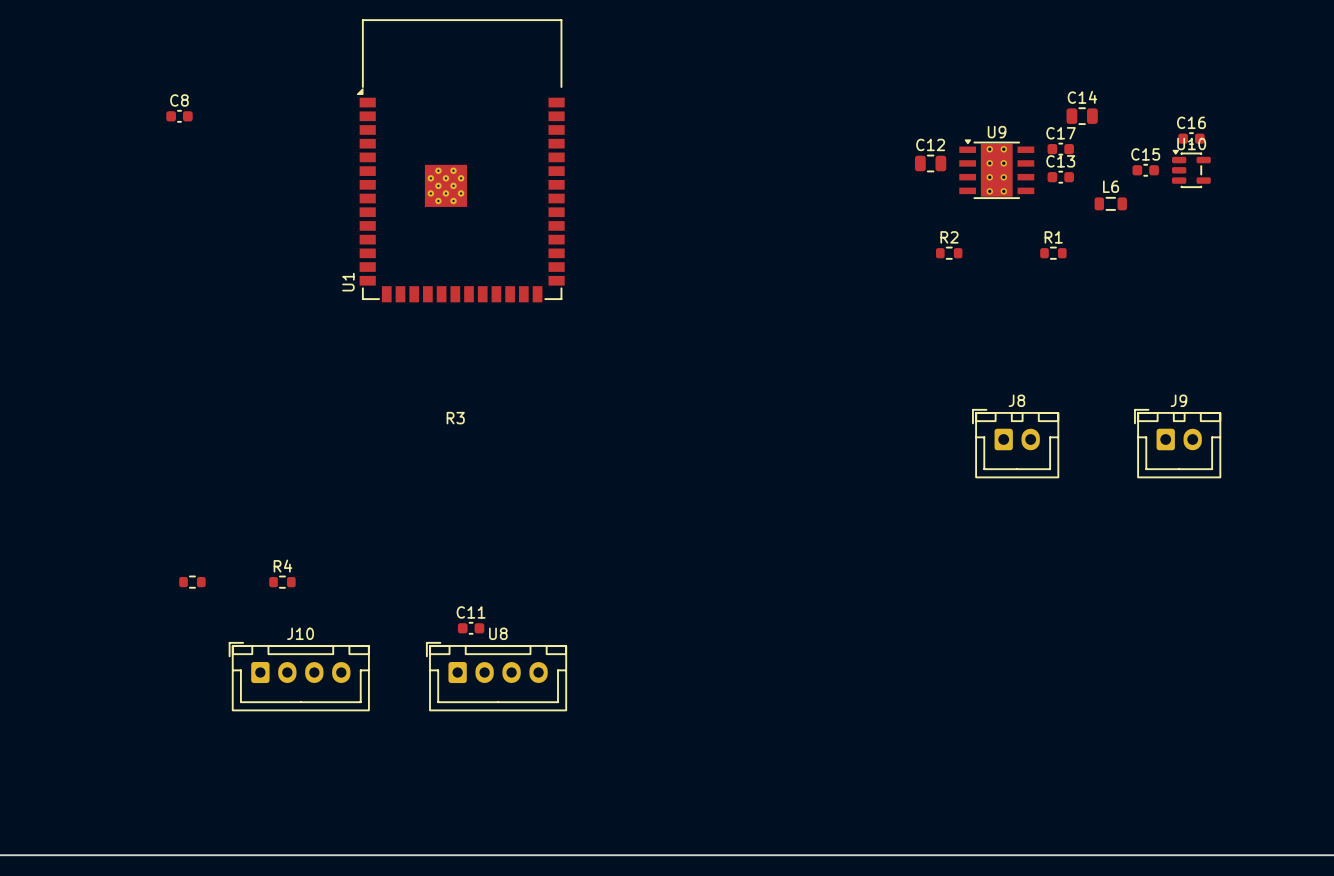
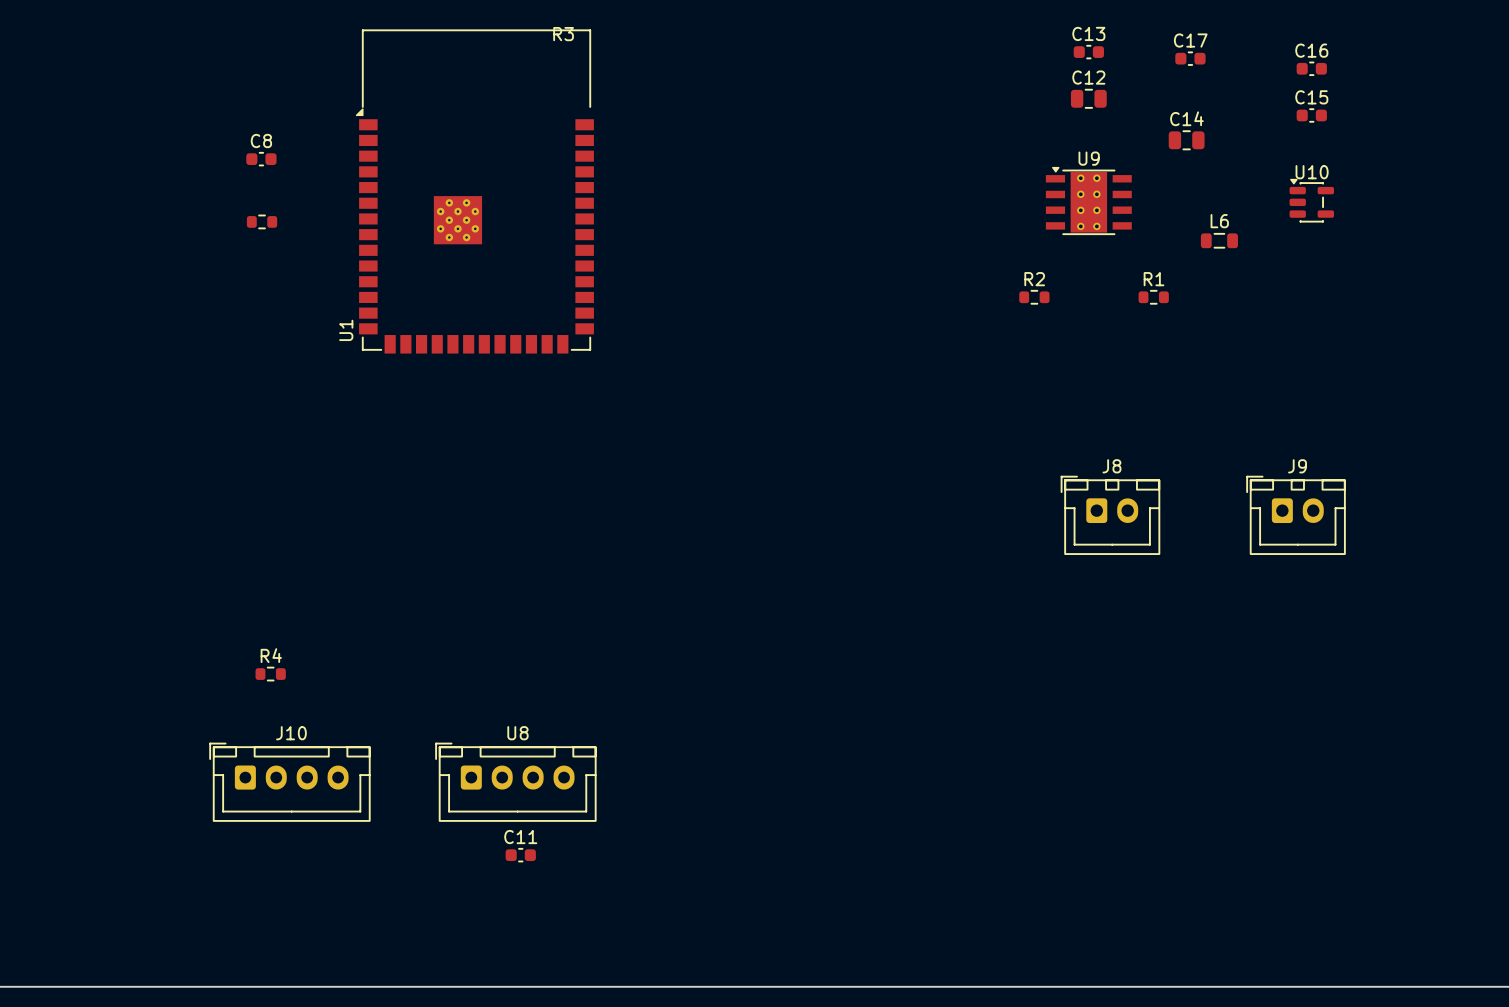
C8 position: (179, 116) -> (261, 159)
C16 position: (1191, 138) -> (1311, 68)
C17 position: (1060, 149) -> (1190, 58)
C12 position: (930, 163) -> (1088, 98)
C15 position: (1145, 170) -> (1311, 115)
C13 position: (1060, 177) -> (1088, 52)
R3 position: (192, 582) -> (262, 221)
C11 position: (471, 628) -> (520, 855)

